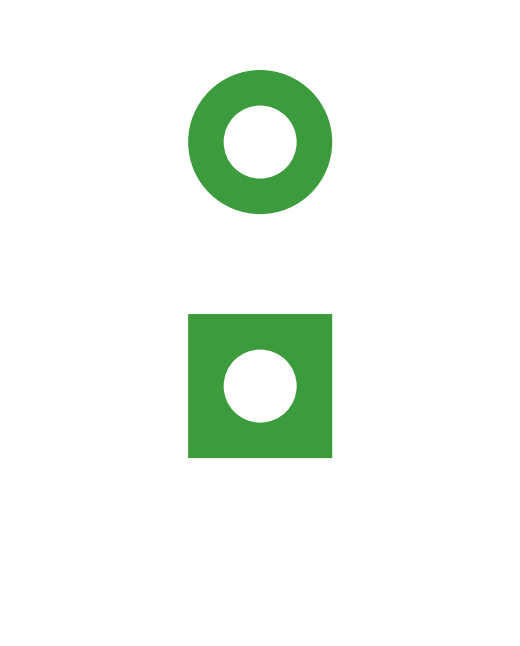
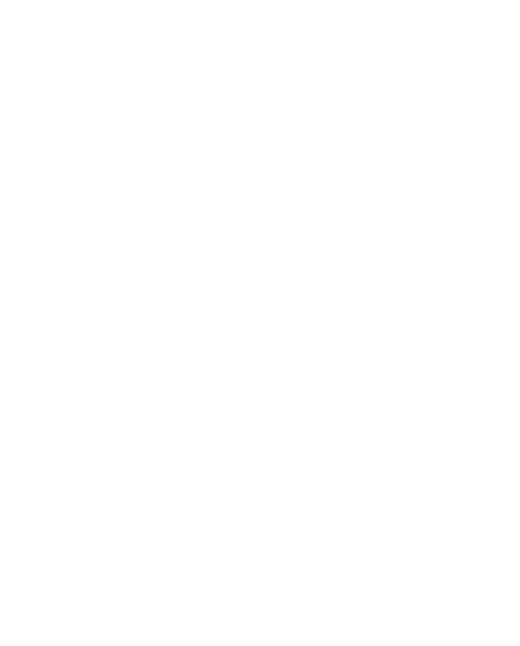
part: (260, 264) -> none

